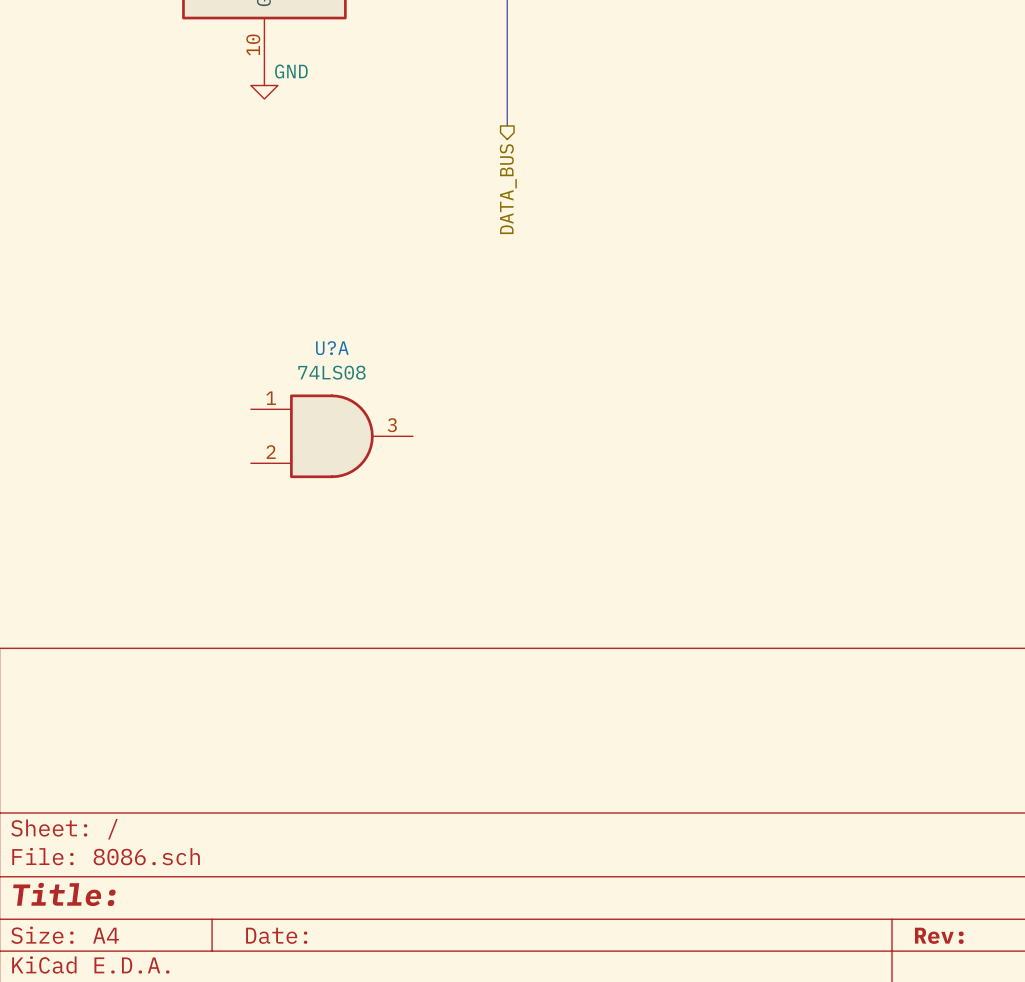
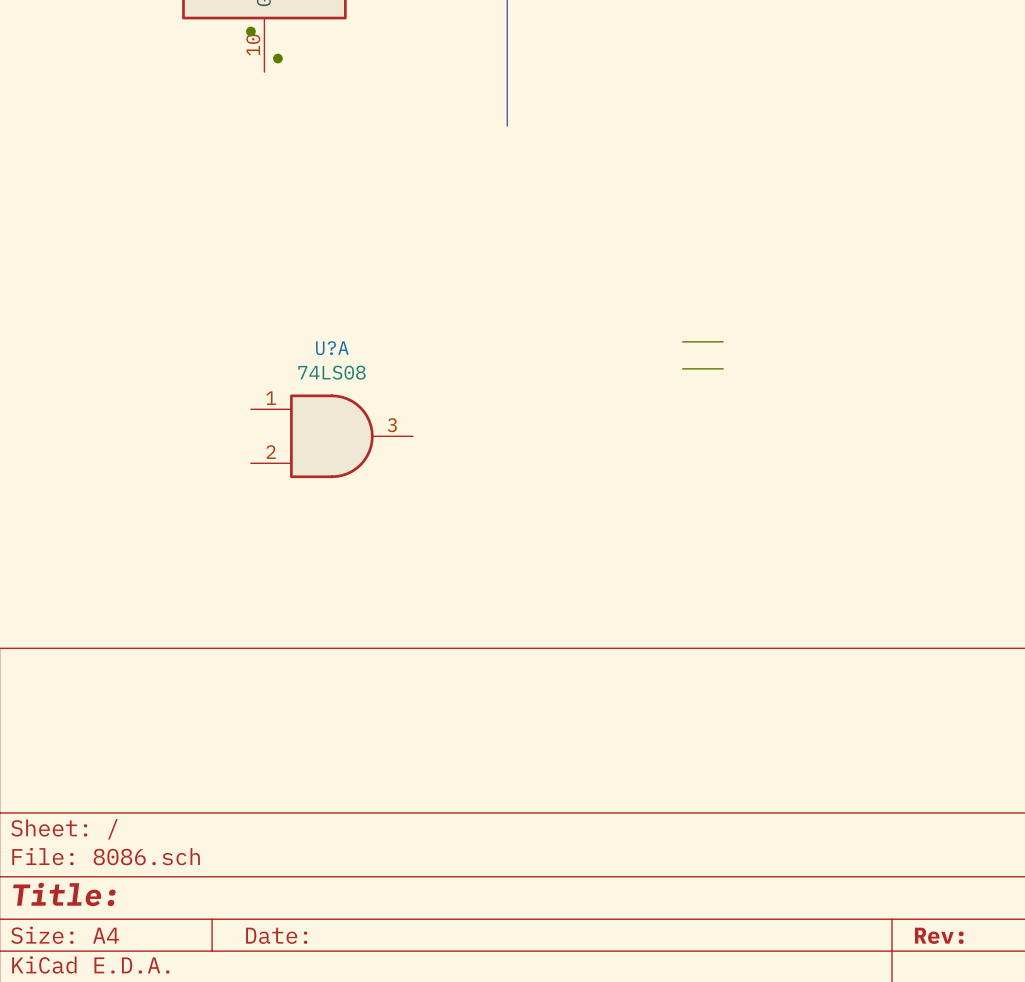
junction: none -> (250, 31)
junction: none -> (277, 58)
power symbol: GND (264, 85) -> none
hierarchical label: DATA_BUS (508, 189) -> none
wire: none -> (682, 341) (723, 341)
wire: none -> (682, 368) (723, 368)

